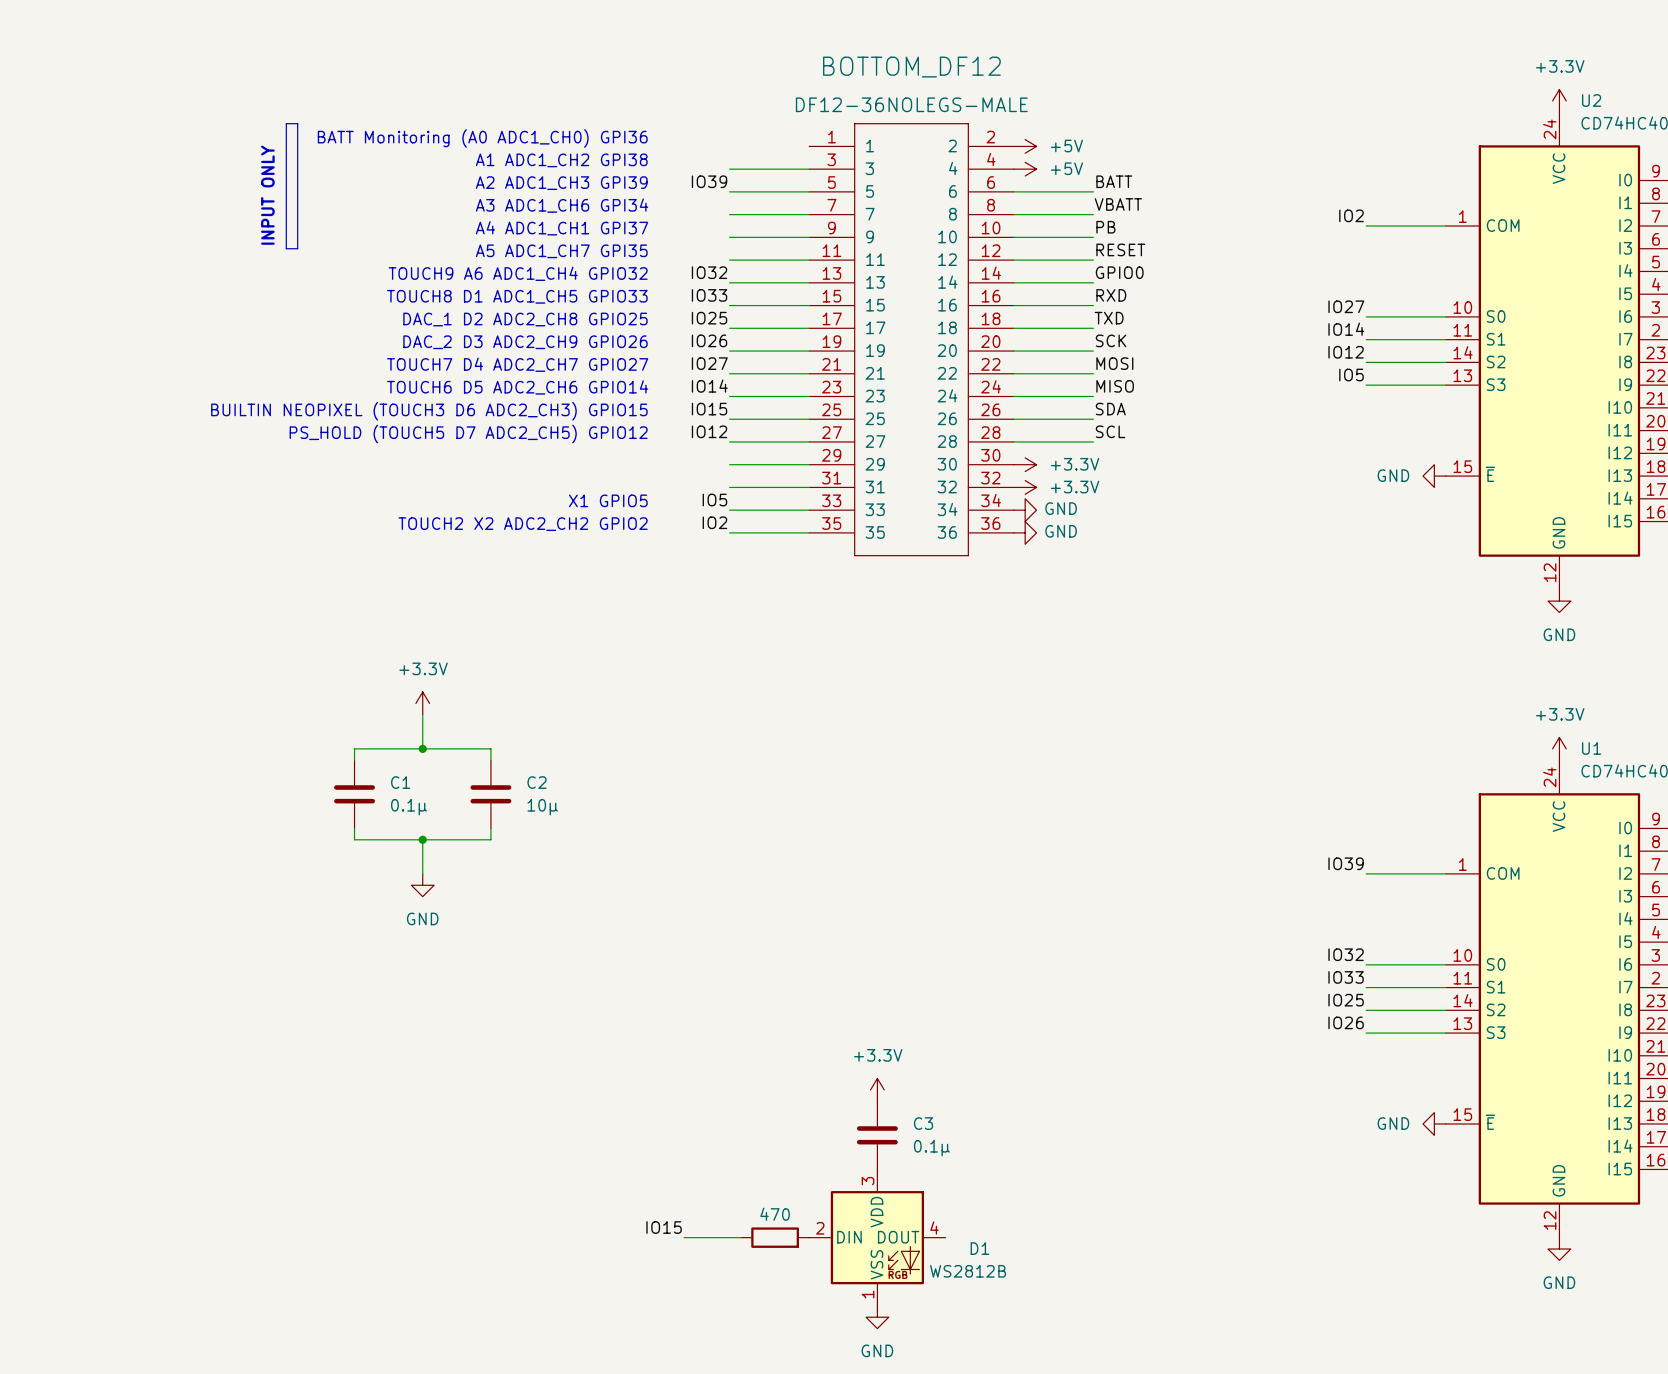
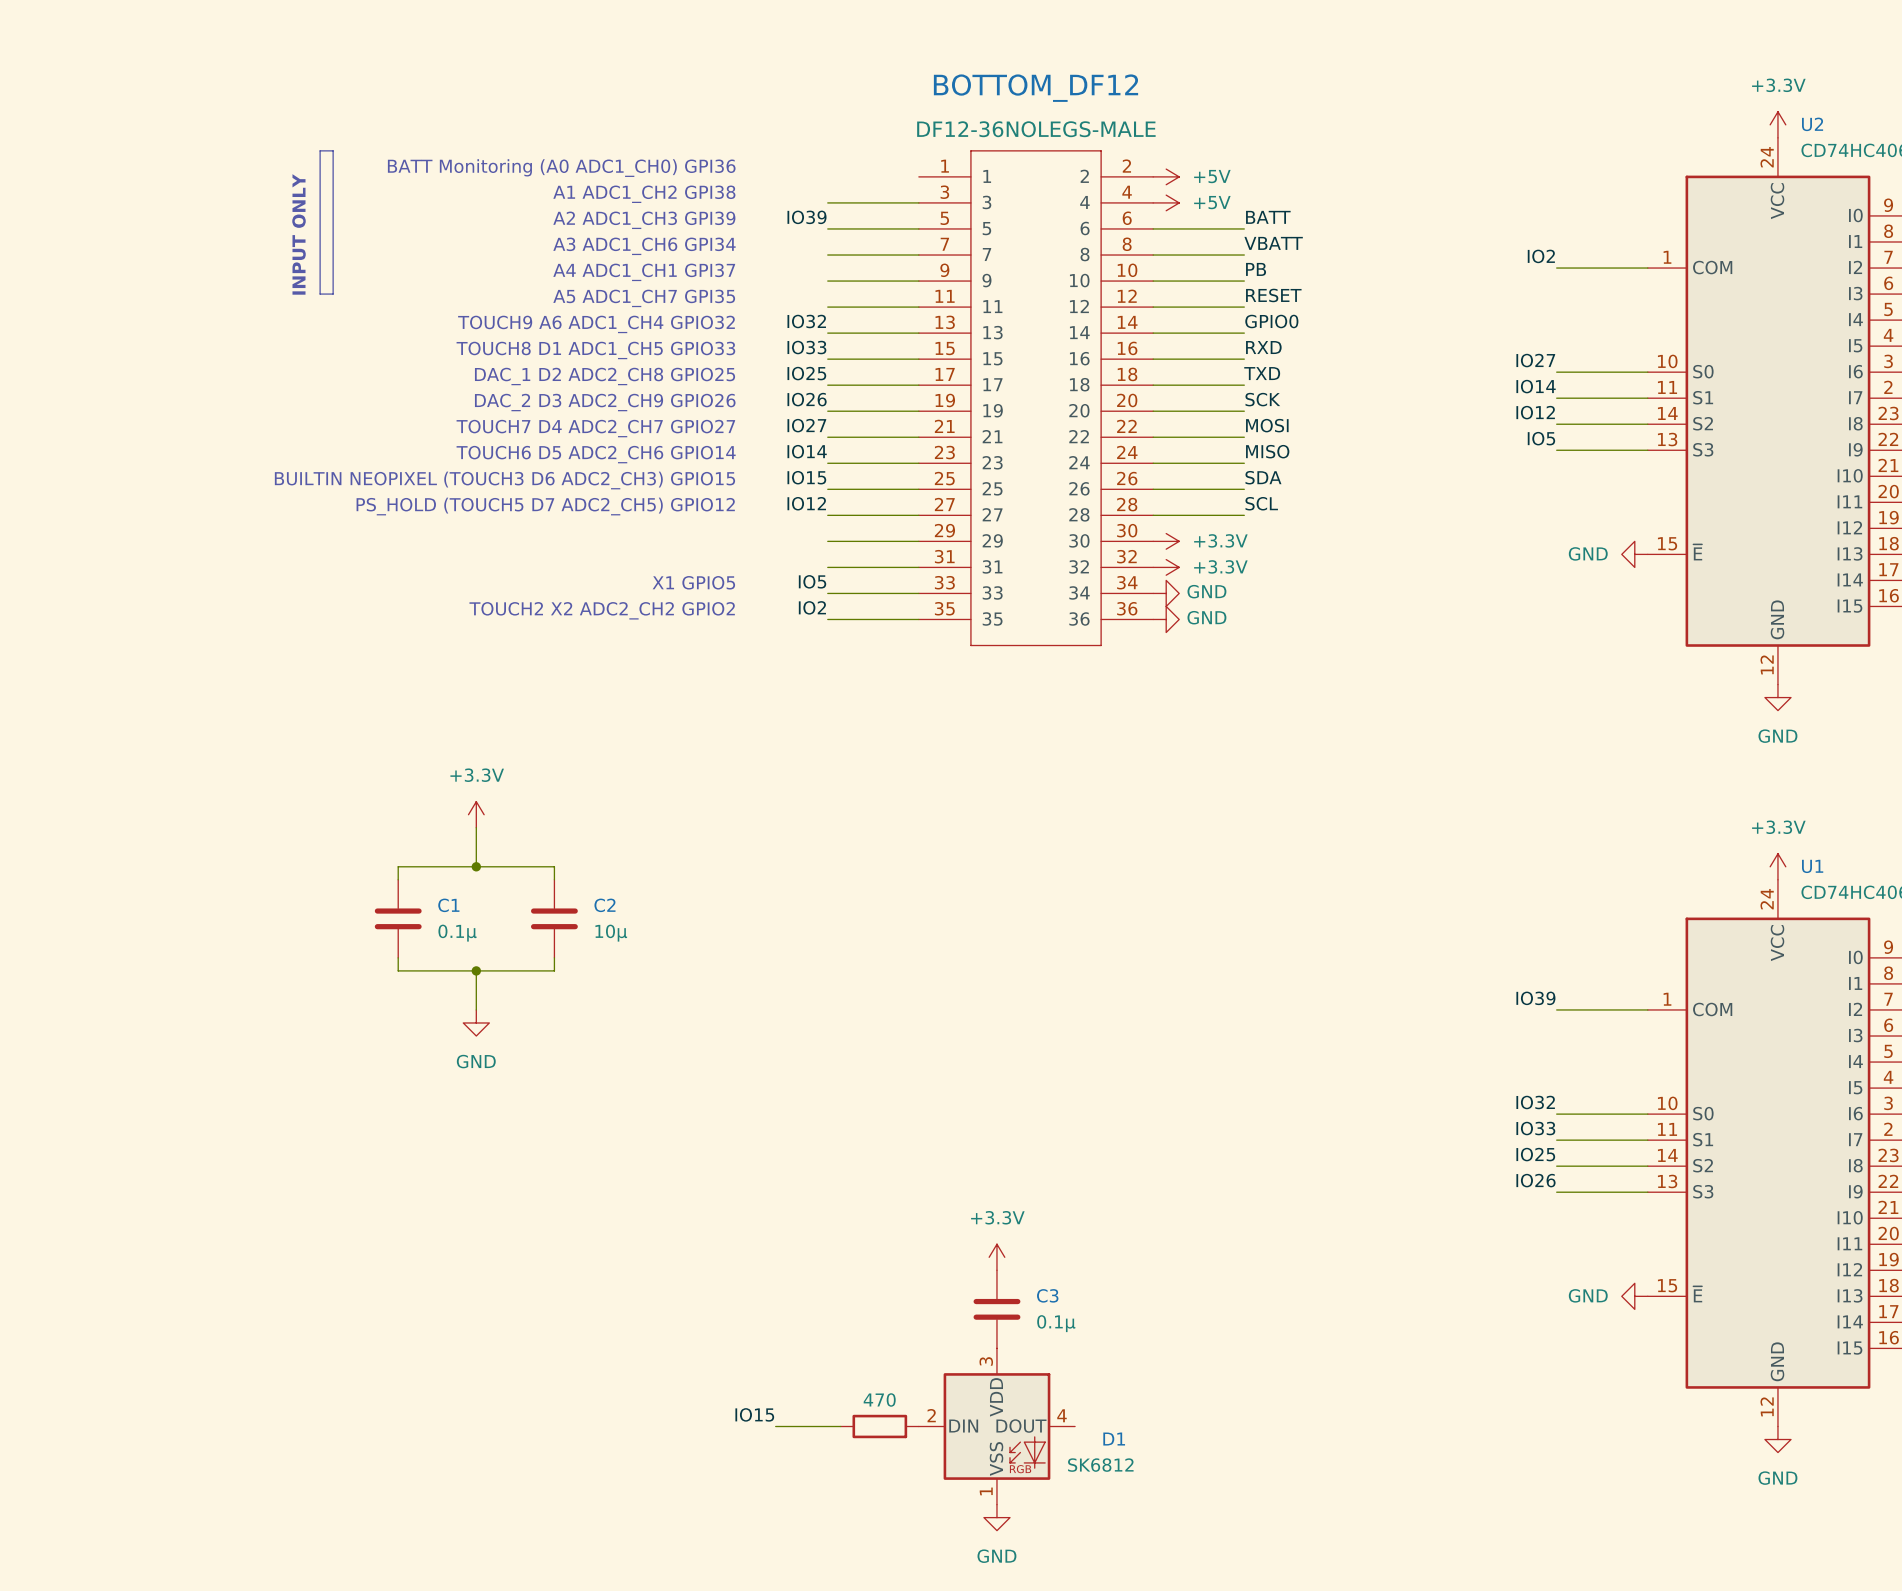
D1 value: WS2812B (968, 1271) -> SK6812 (1100, 1465)

